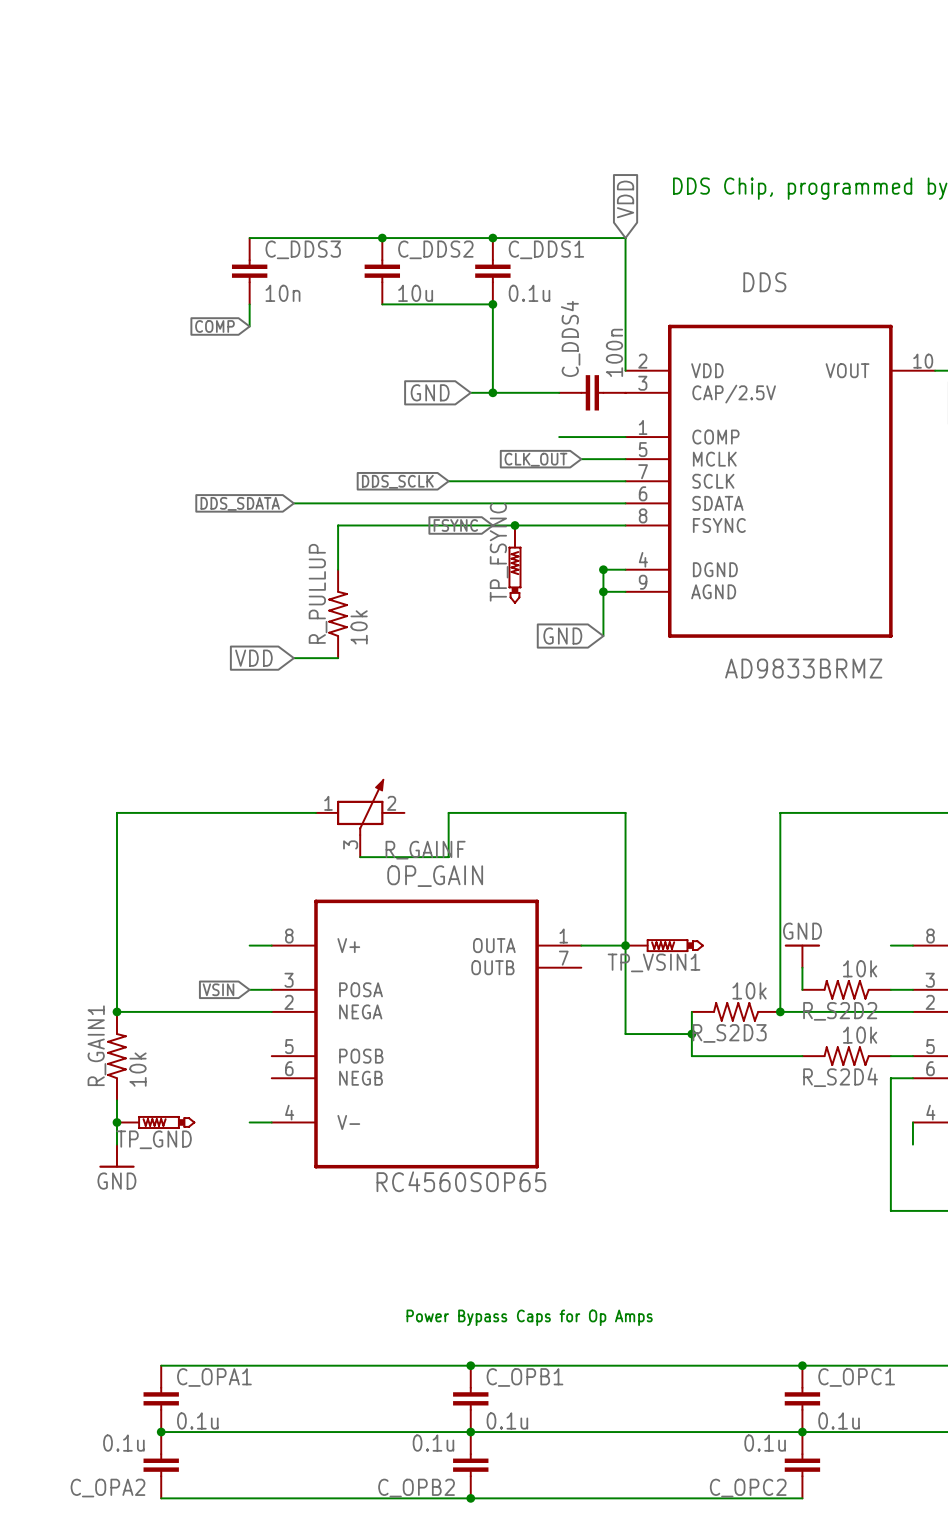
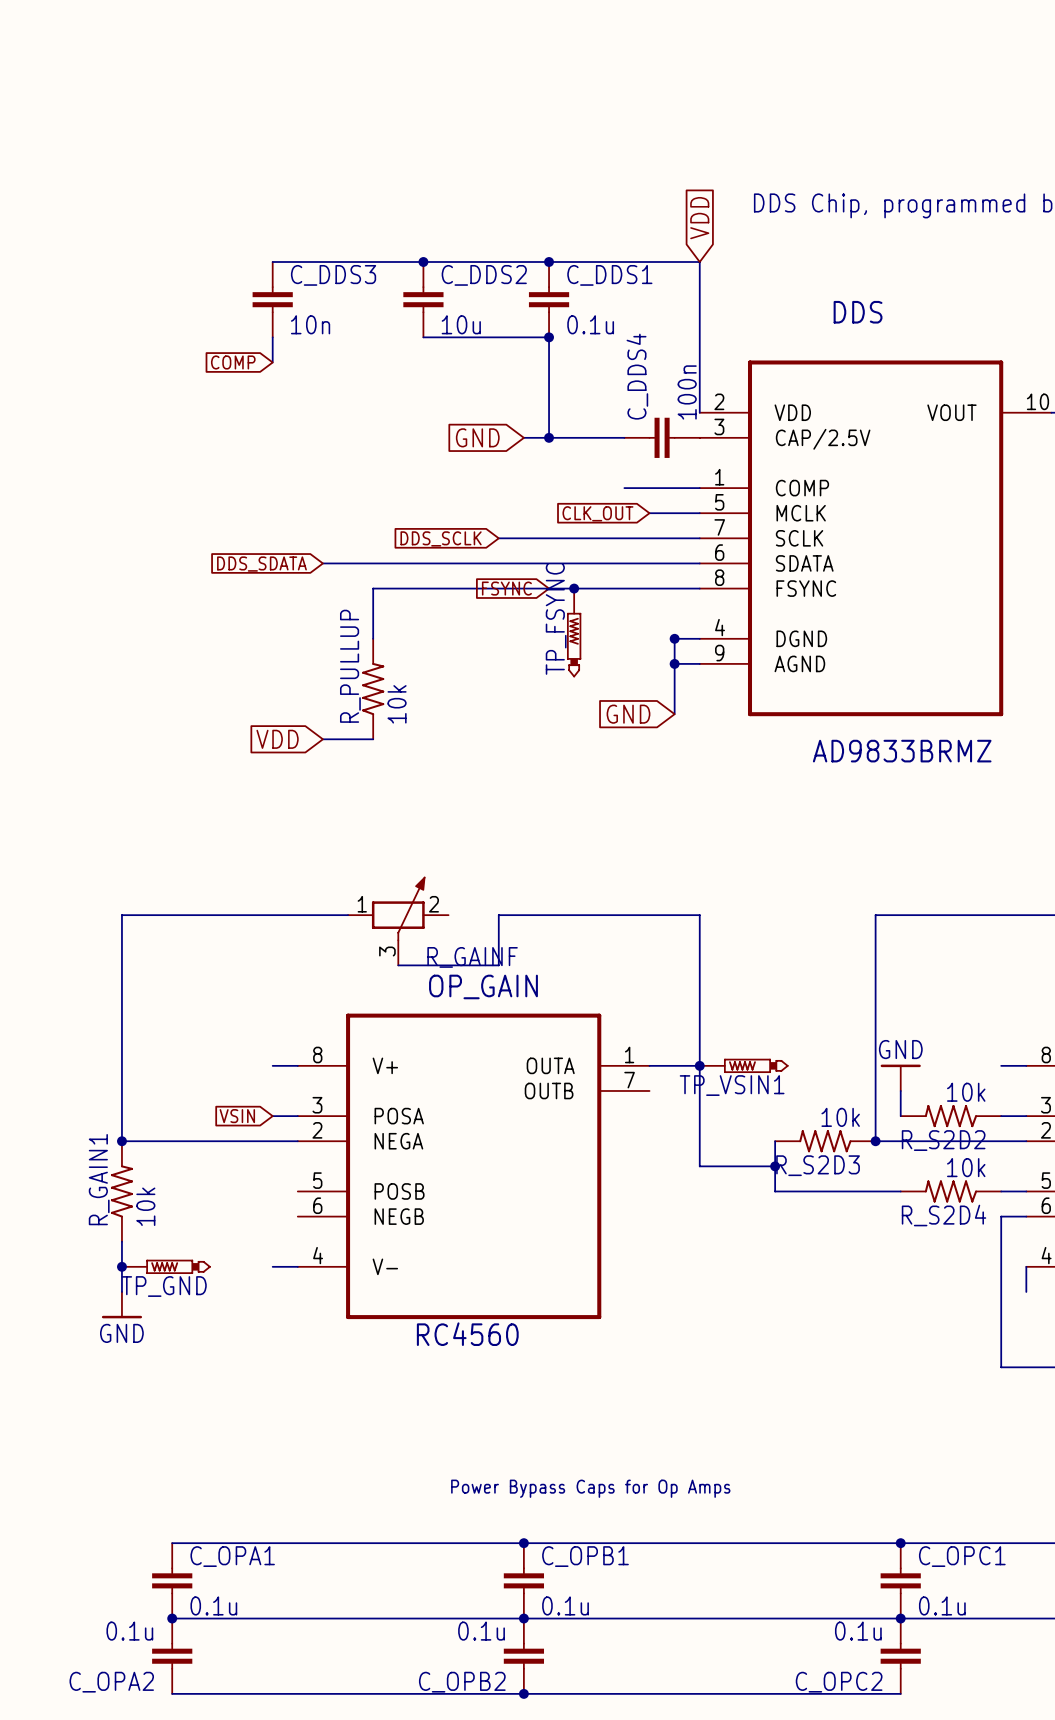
OP_GAIN value: RC4560SOP65 (461, 1181) -> RC4560 (467, 1334)

